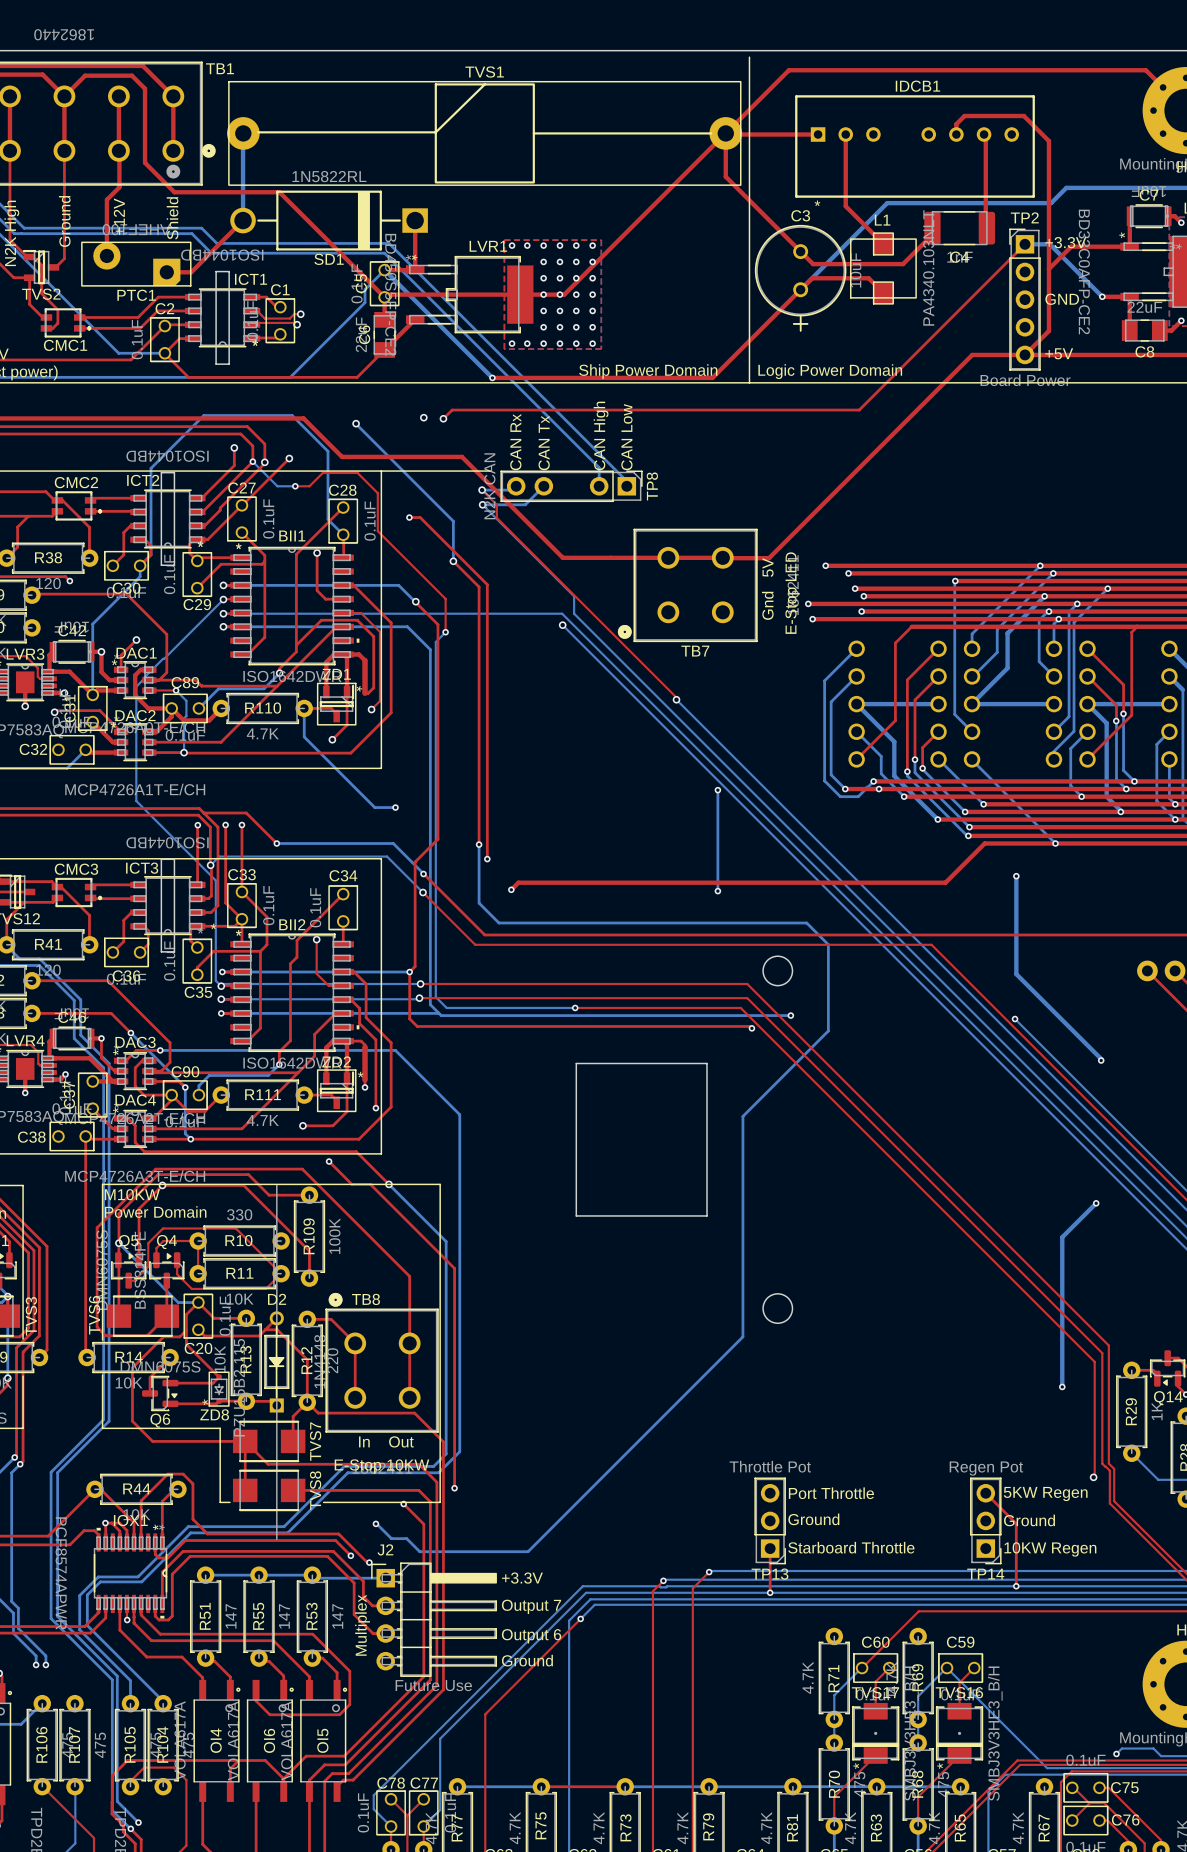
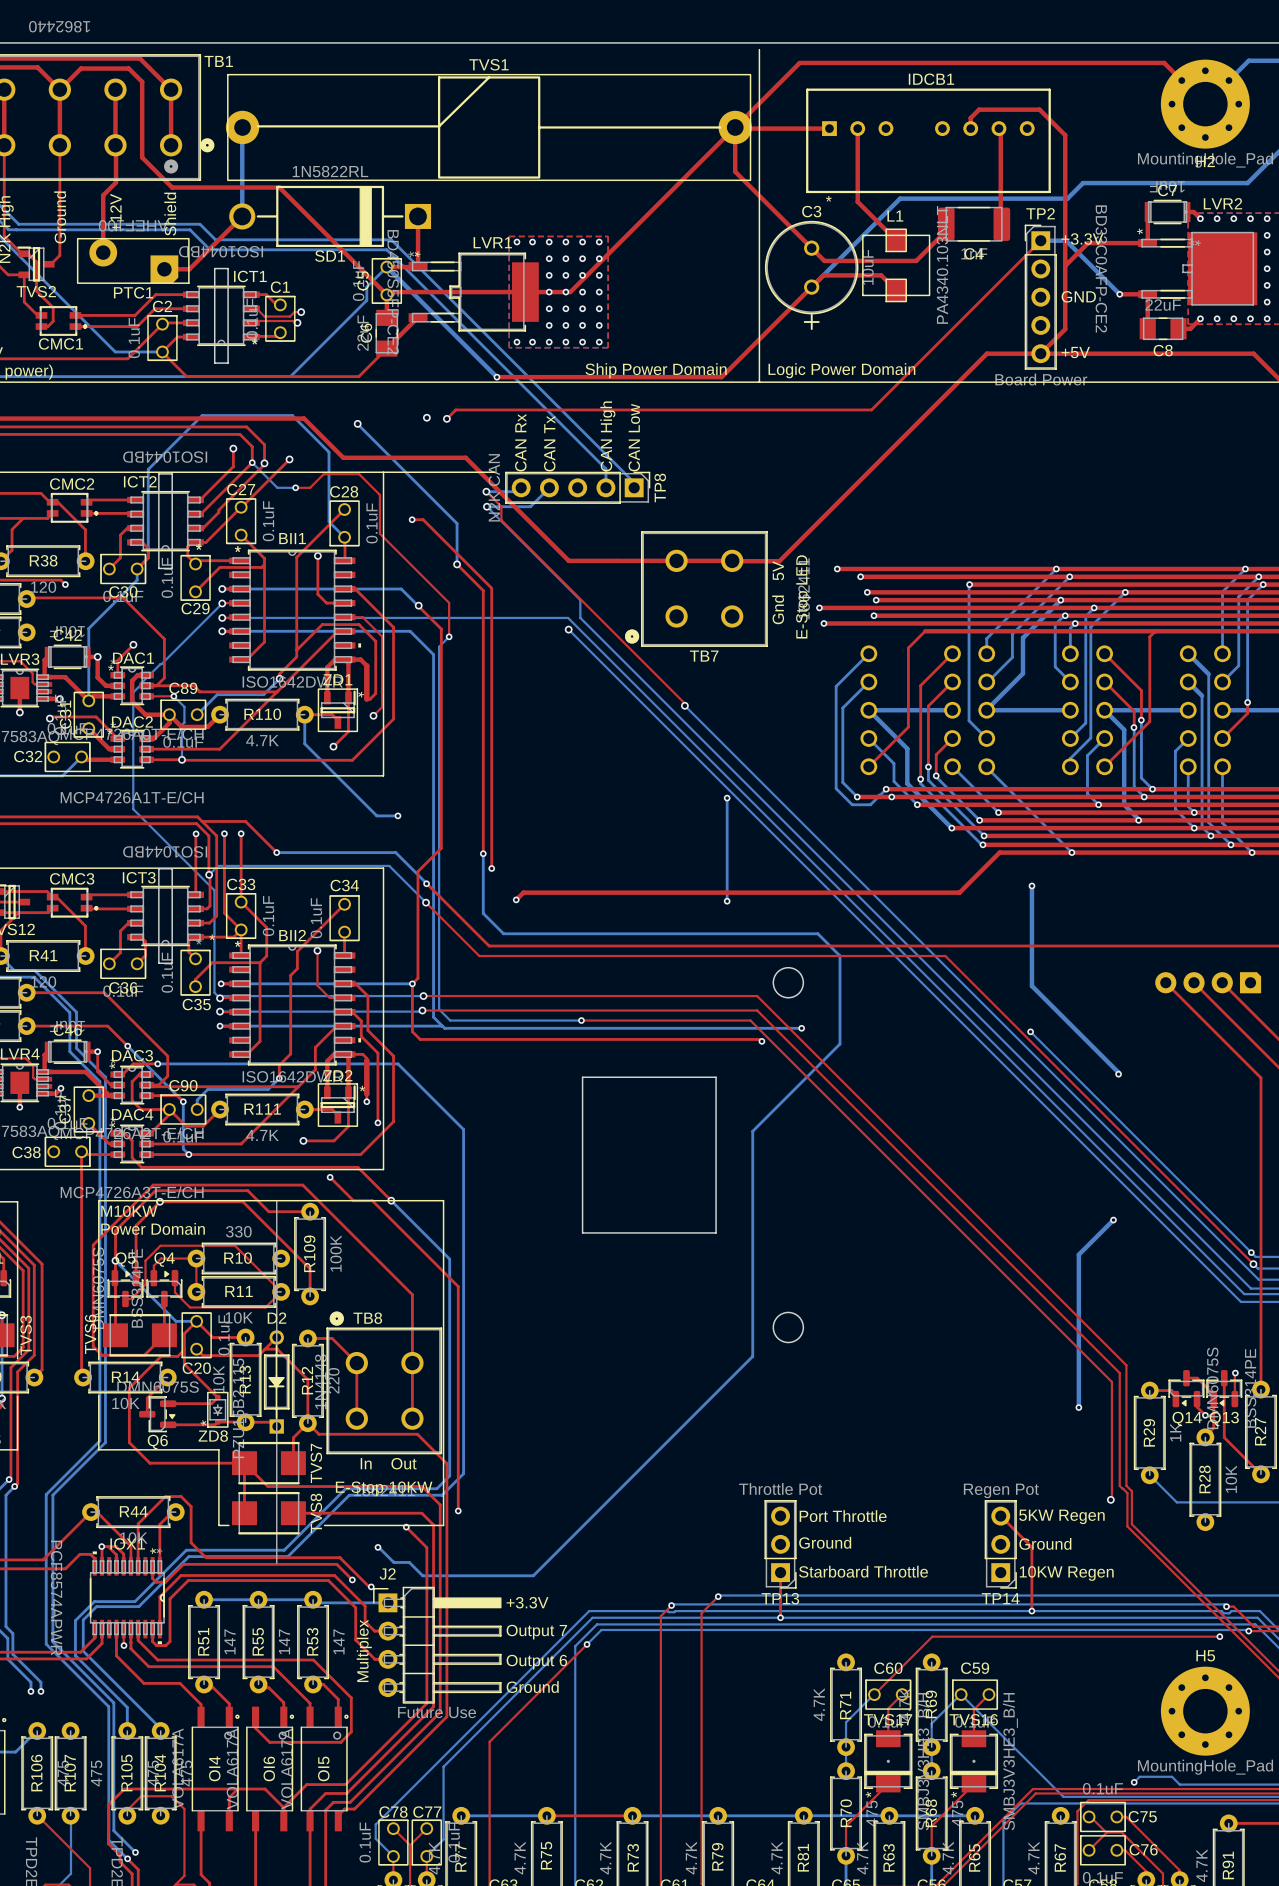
TP8 footprint: [500, 470, 643, 502] -> [505, 471, 651, 504]

